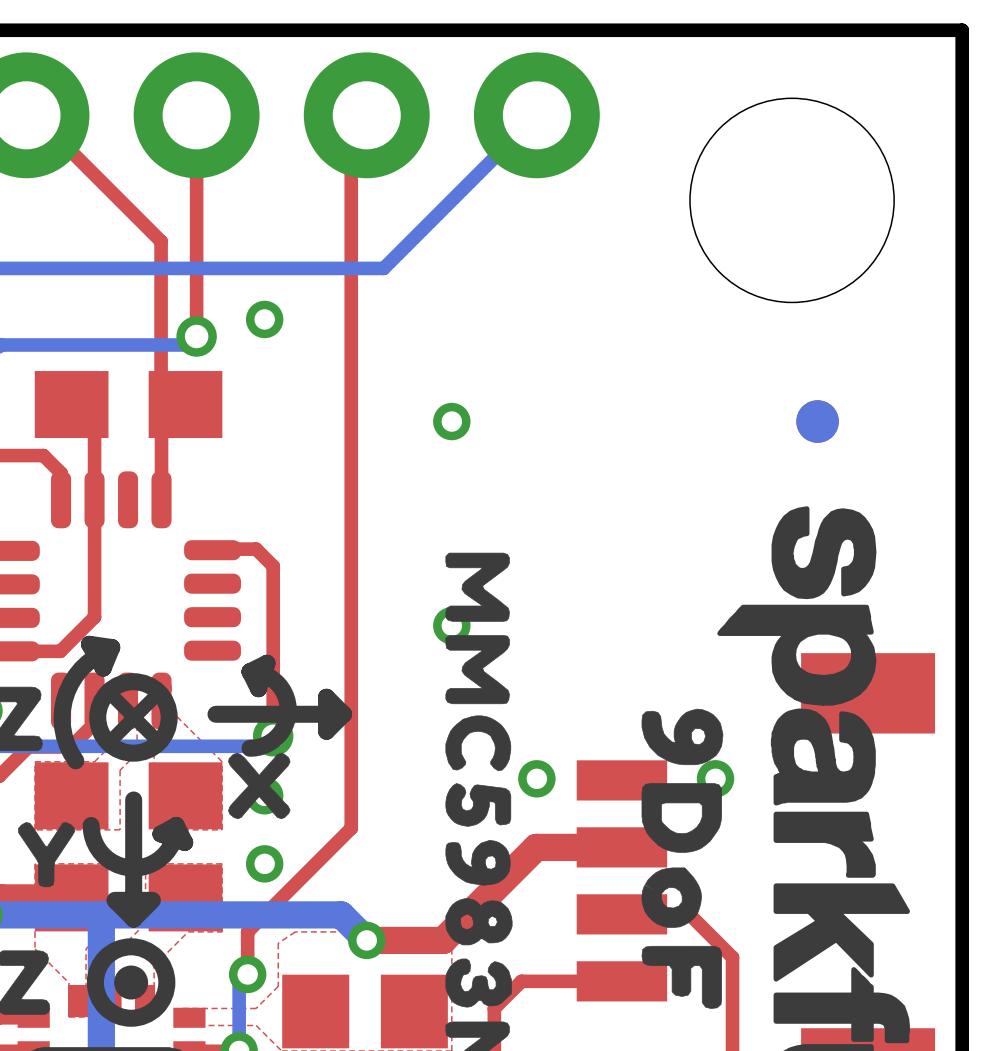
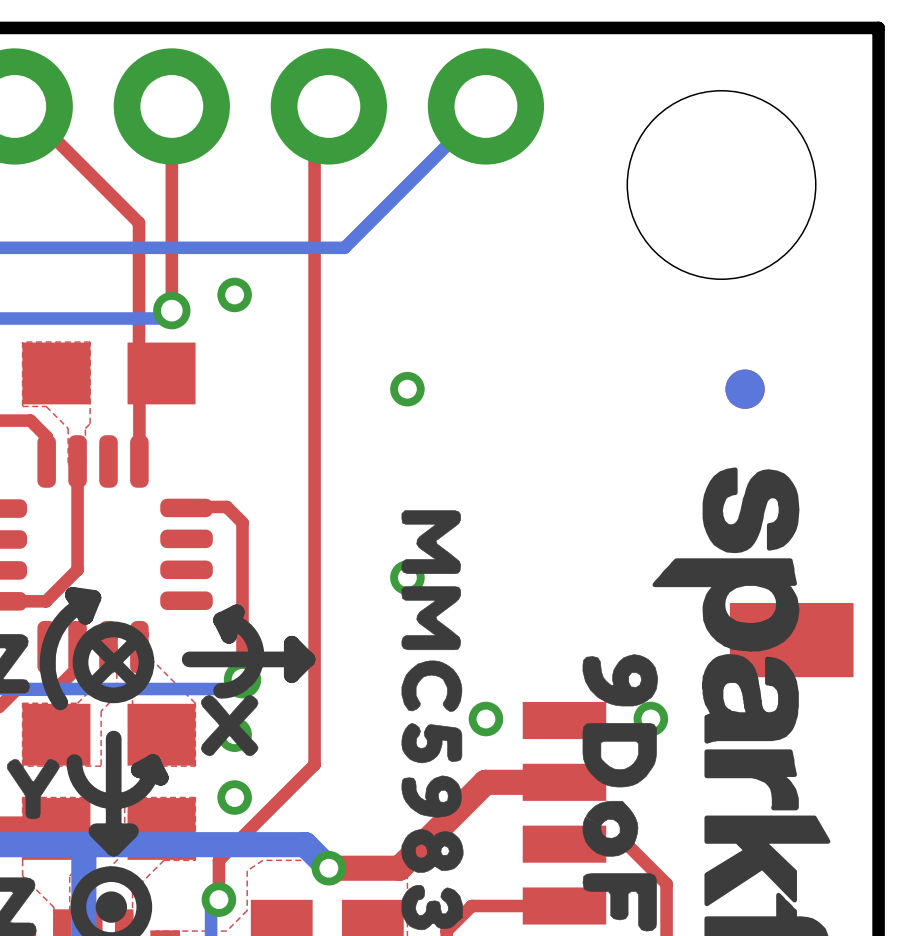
top zone outline: none -> (90, 342) (90, 423) (85, 428) (85, 464) (68, 464) (68, 428) (46, 406) (22, 406) (22, 342) (90, 342)
top track: (94, 427) (94, 499) -> none

